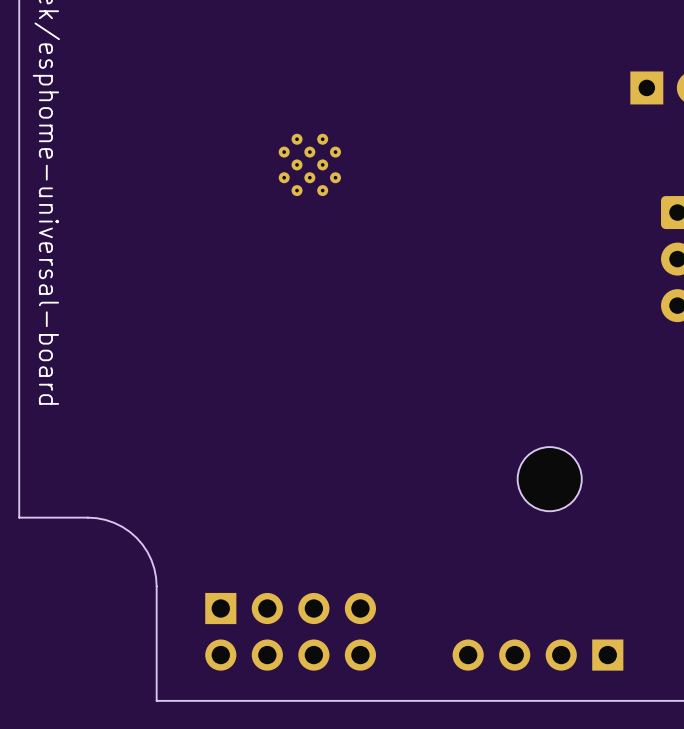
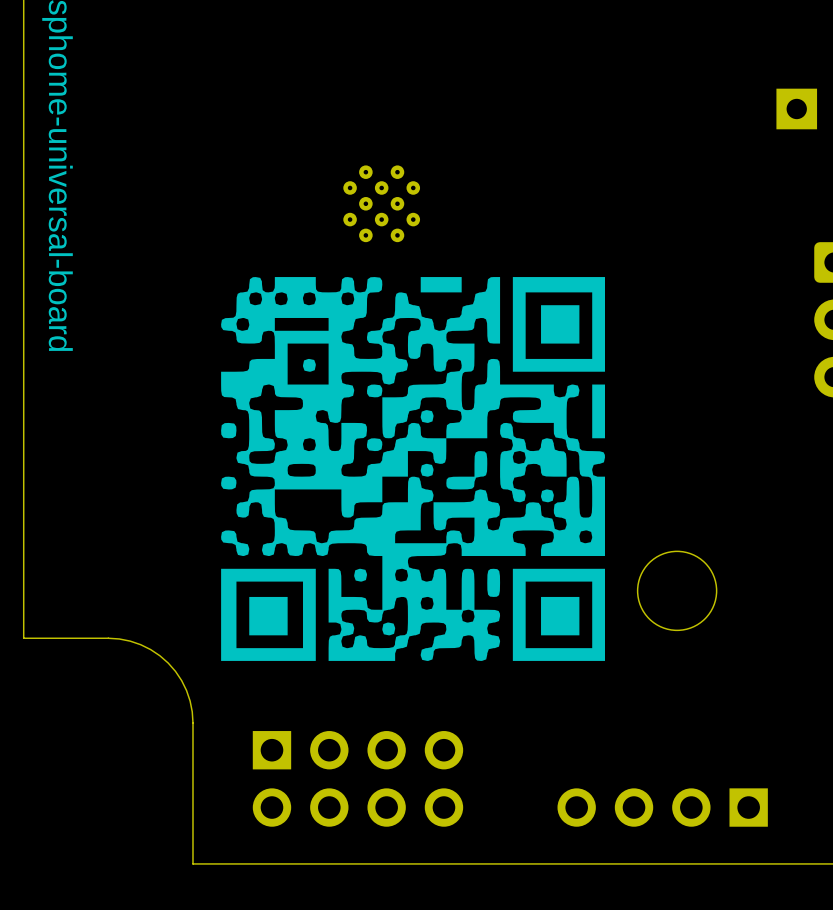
drawing: none -> [221, 277, 606, 661]

